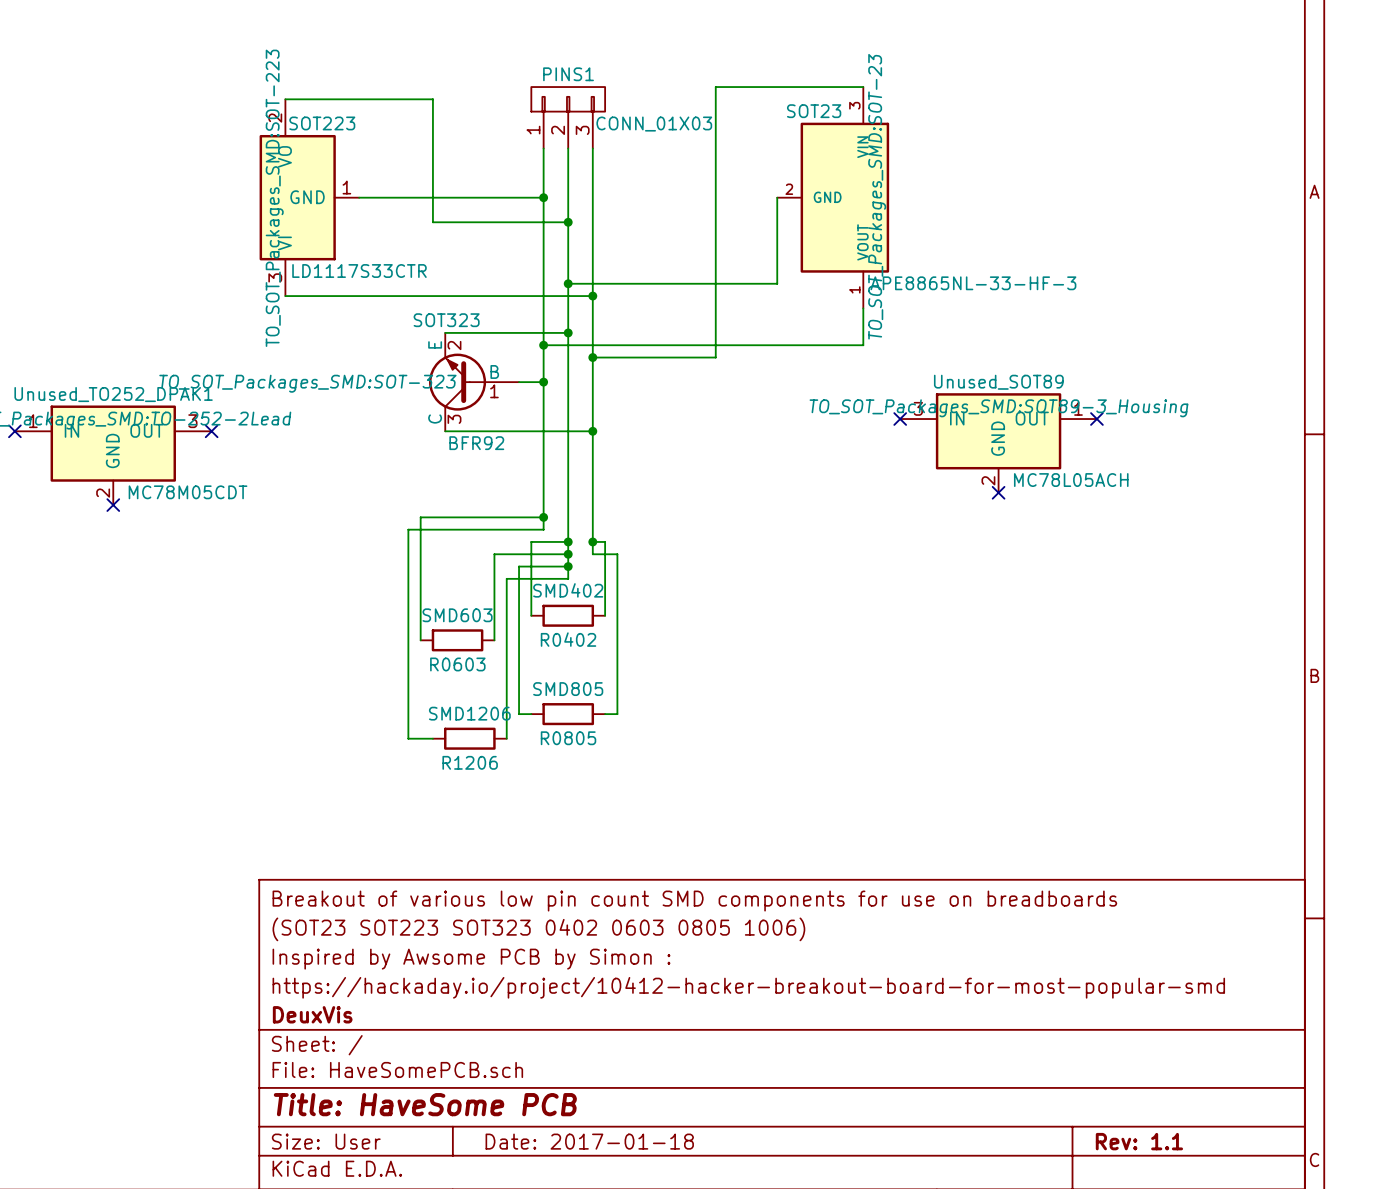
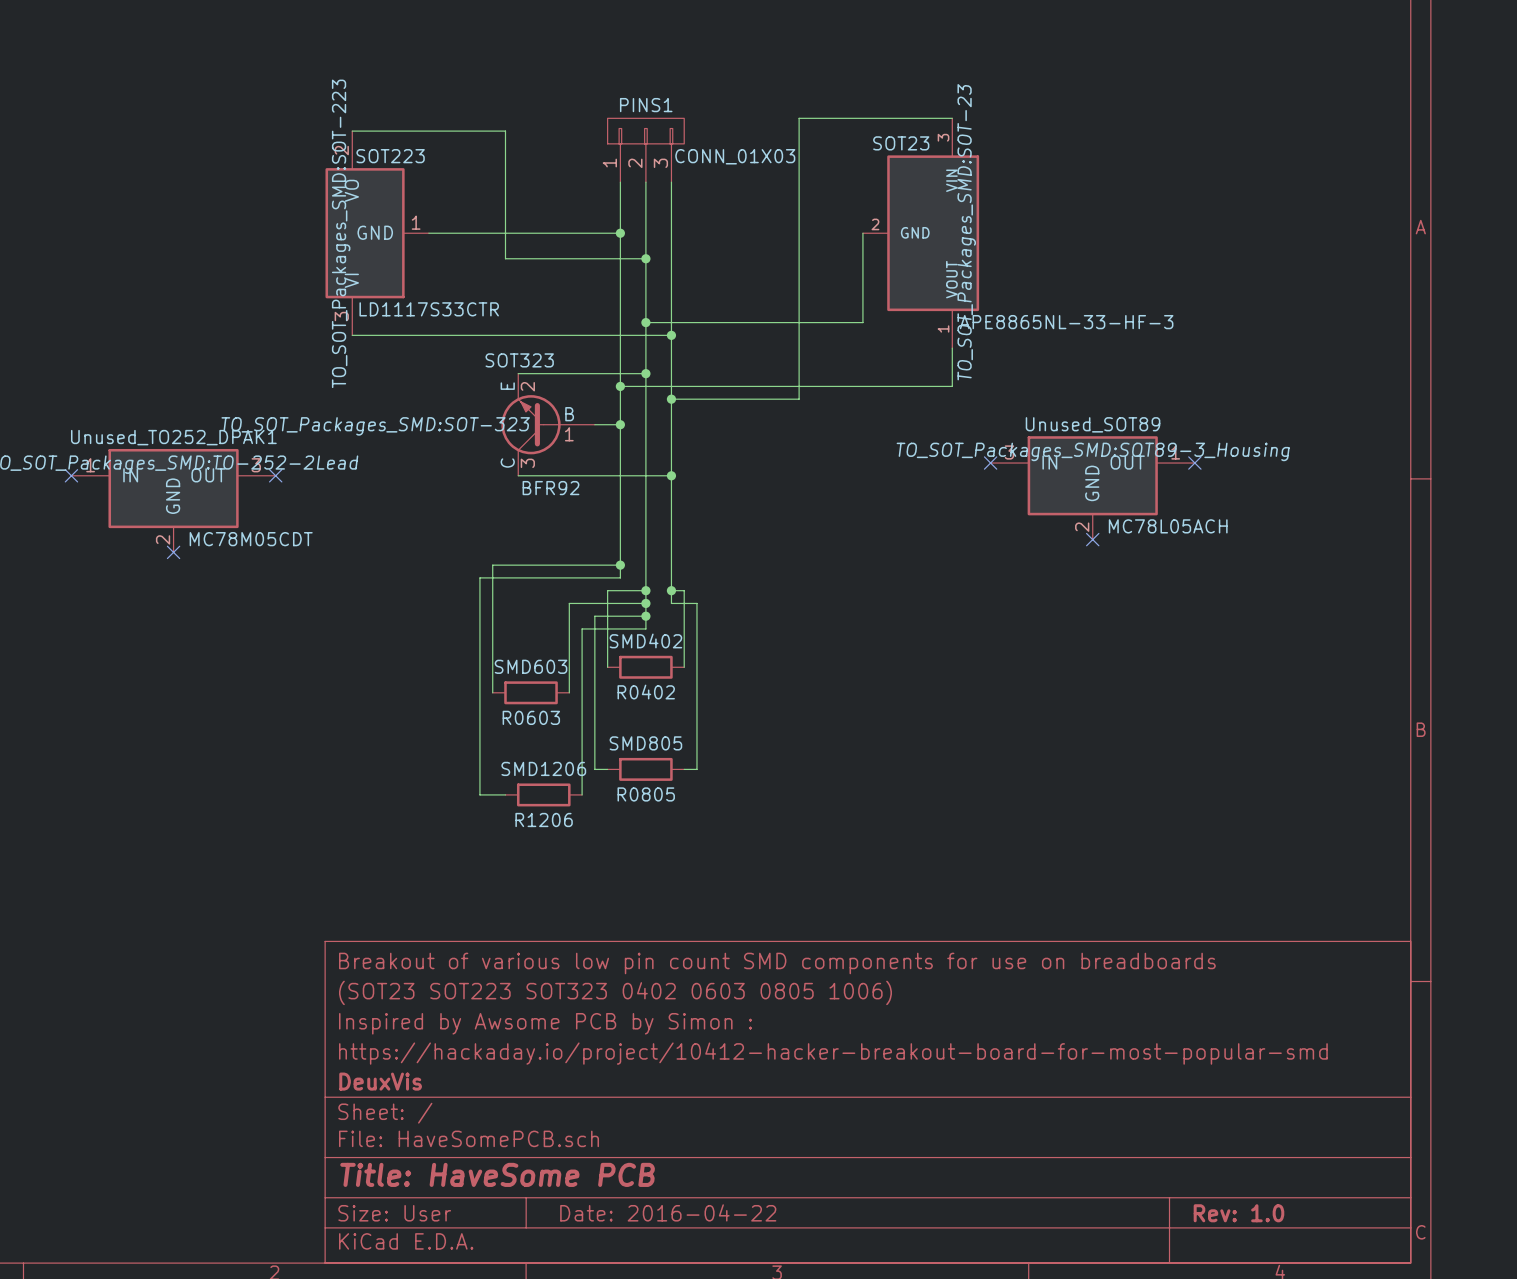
title block: Date: 2017-01-18 (589, 1141) -> Date: 2016-04-22 (668, 1212)
title block: Rev: 1.1 (1139, 1141) -> Rev: 1.0 (1238, 1213)

